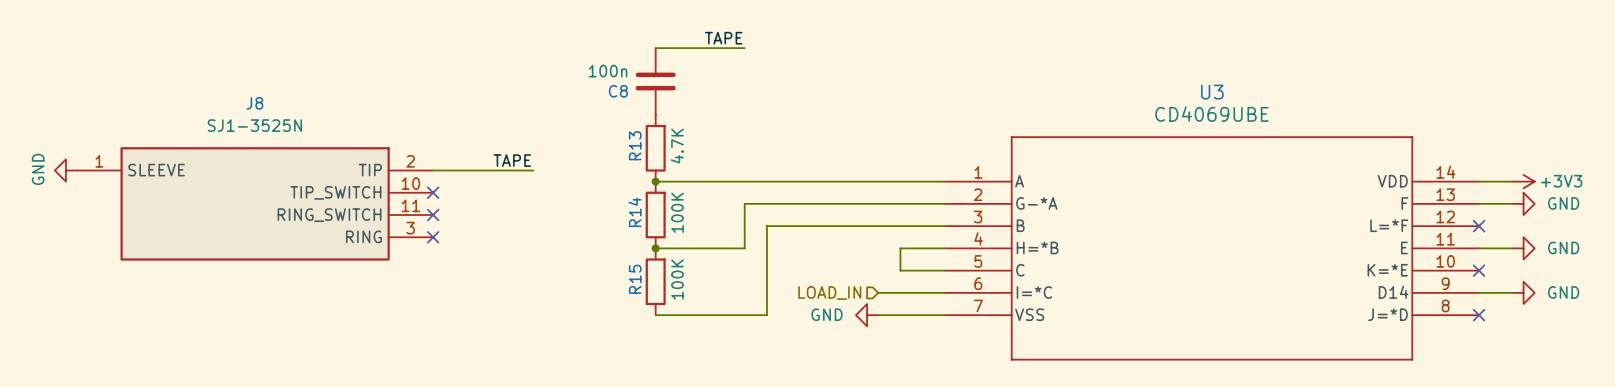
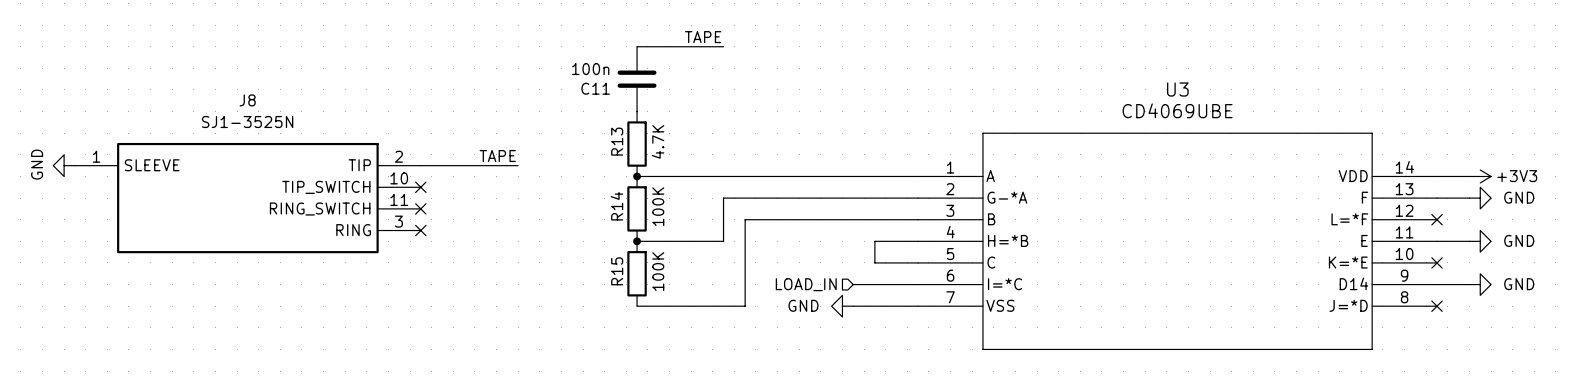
C8 name: C8 (618, 91) -> C11 (595, 88)

